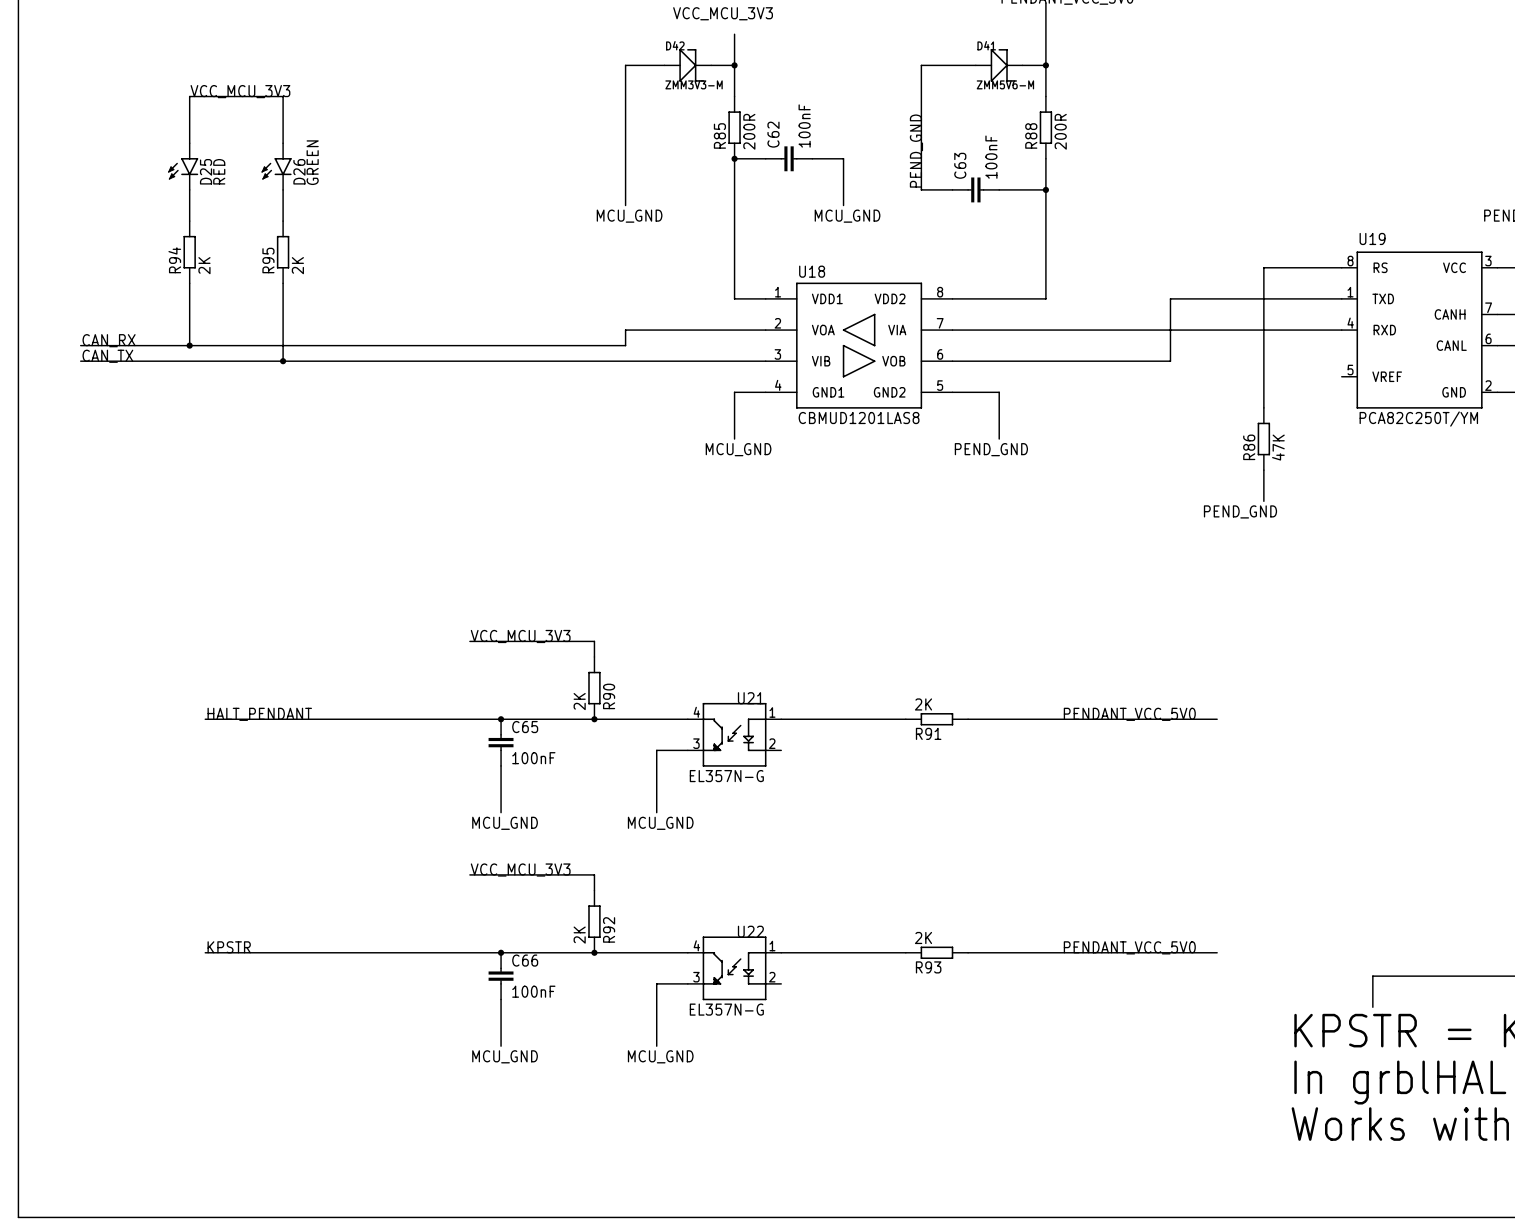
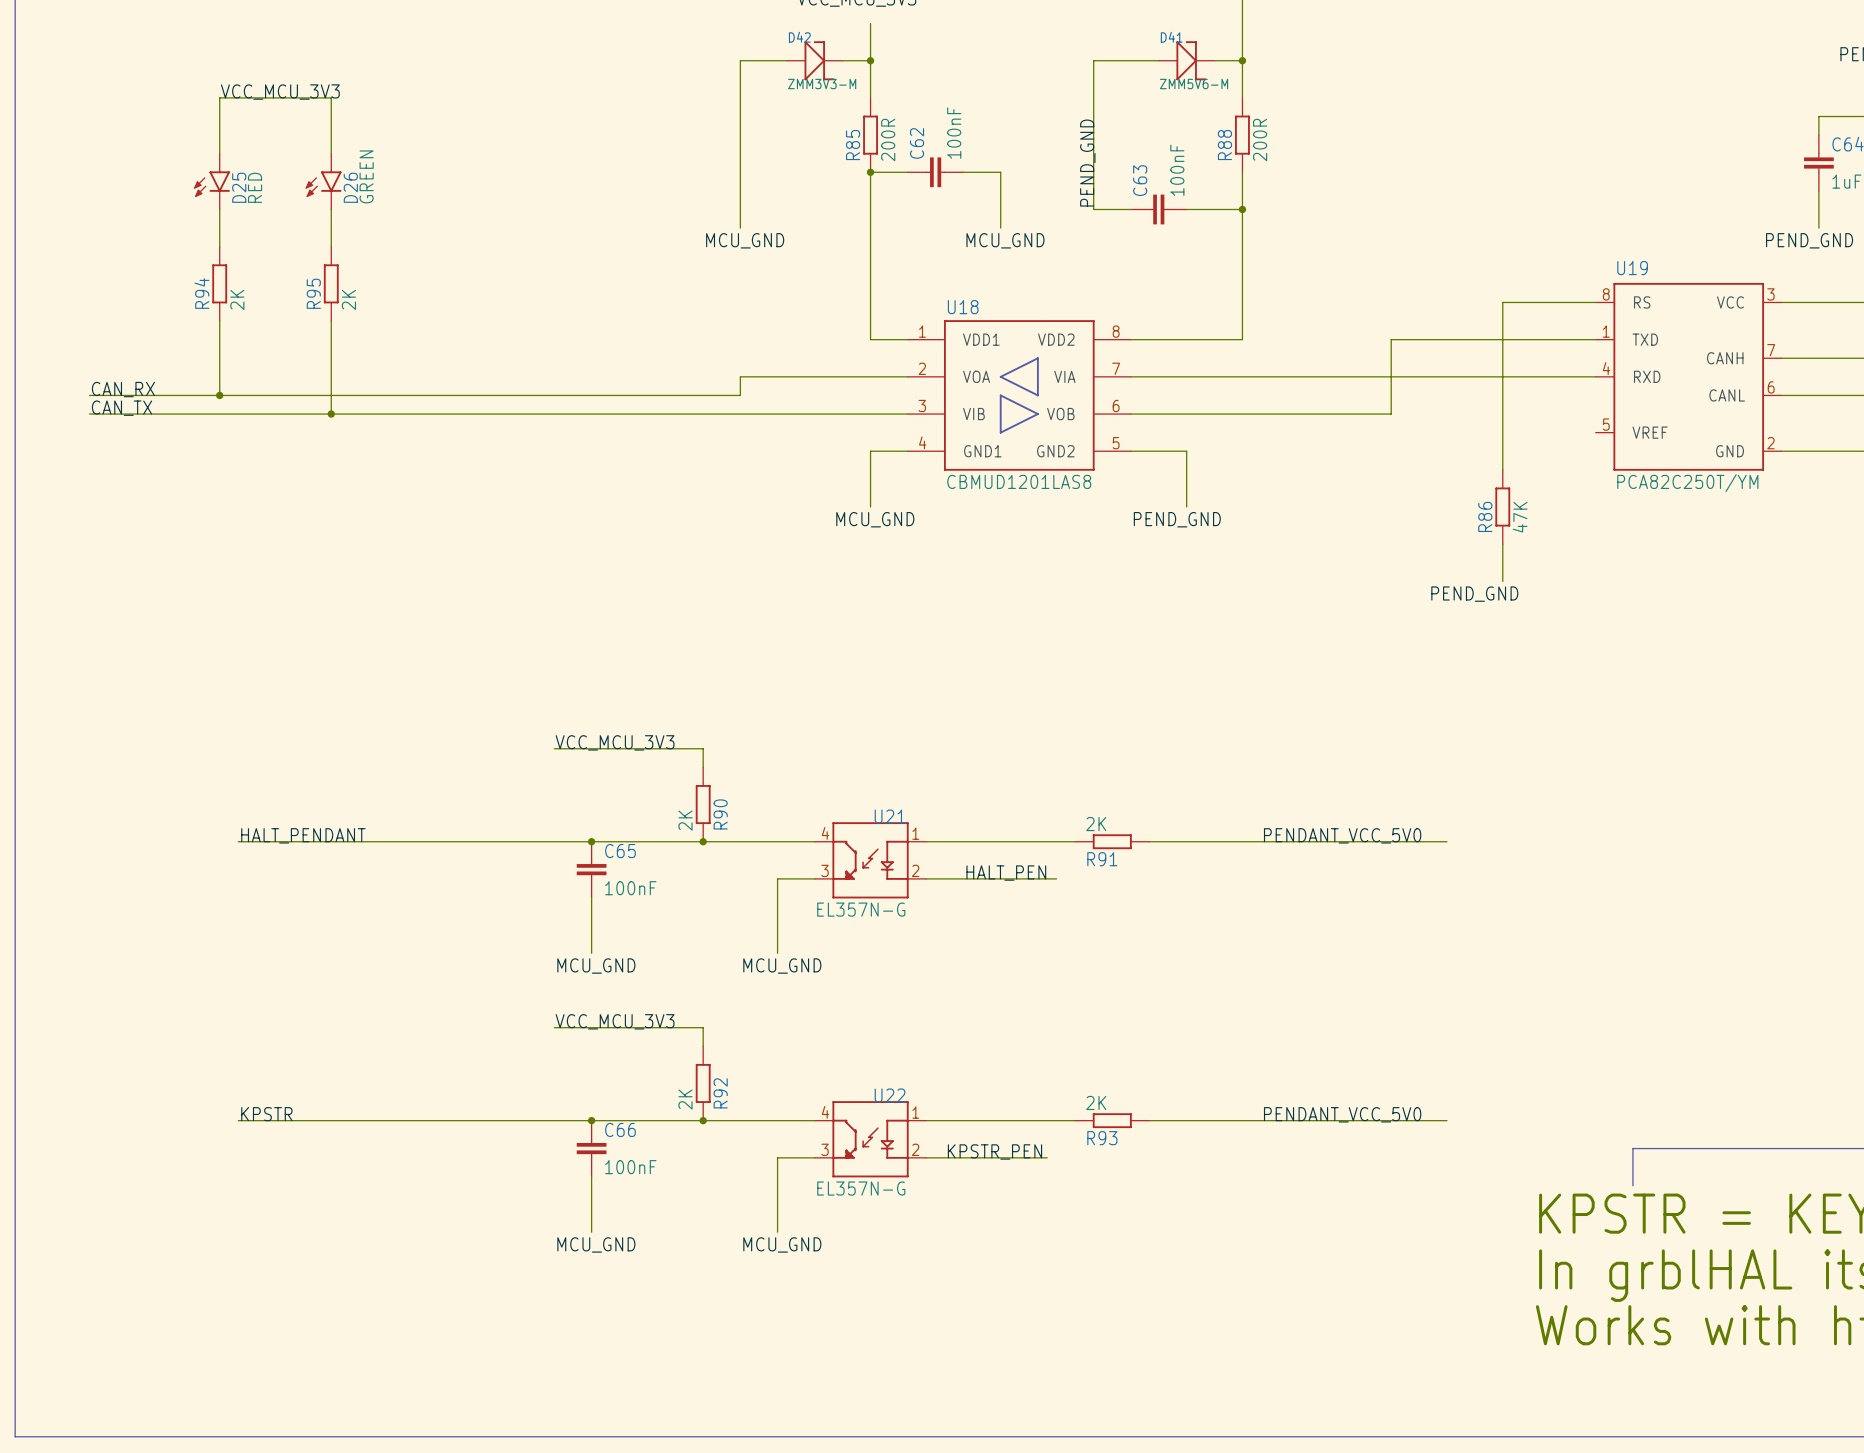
label: none -> HALT_PEN (1006, 873)
wire: none -> (926, 878) (1056, 878)
label: none -> KPSTR_PEN (994, 1151)
wire: none -> (926, 1157) (1047, 1157)

